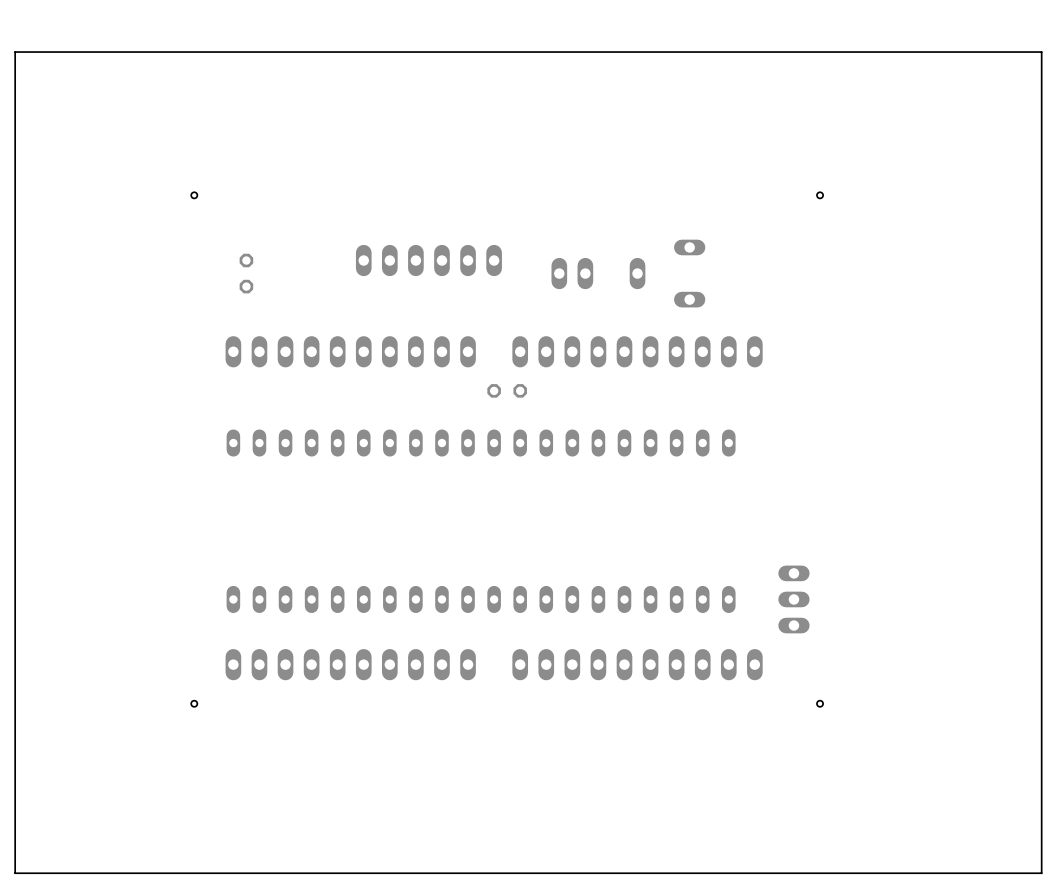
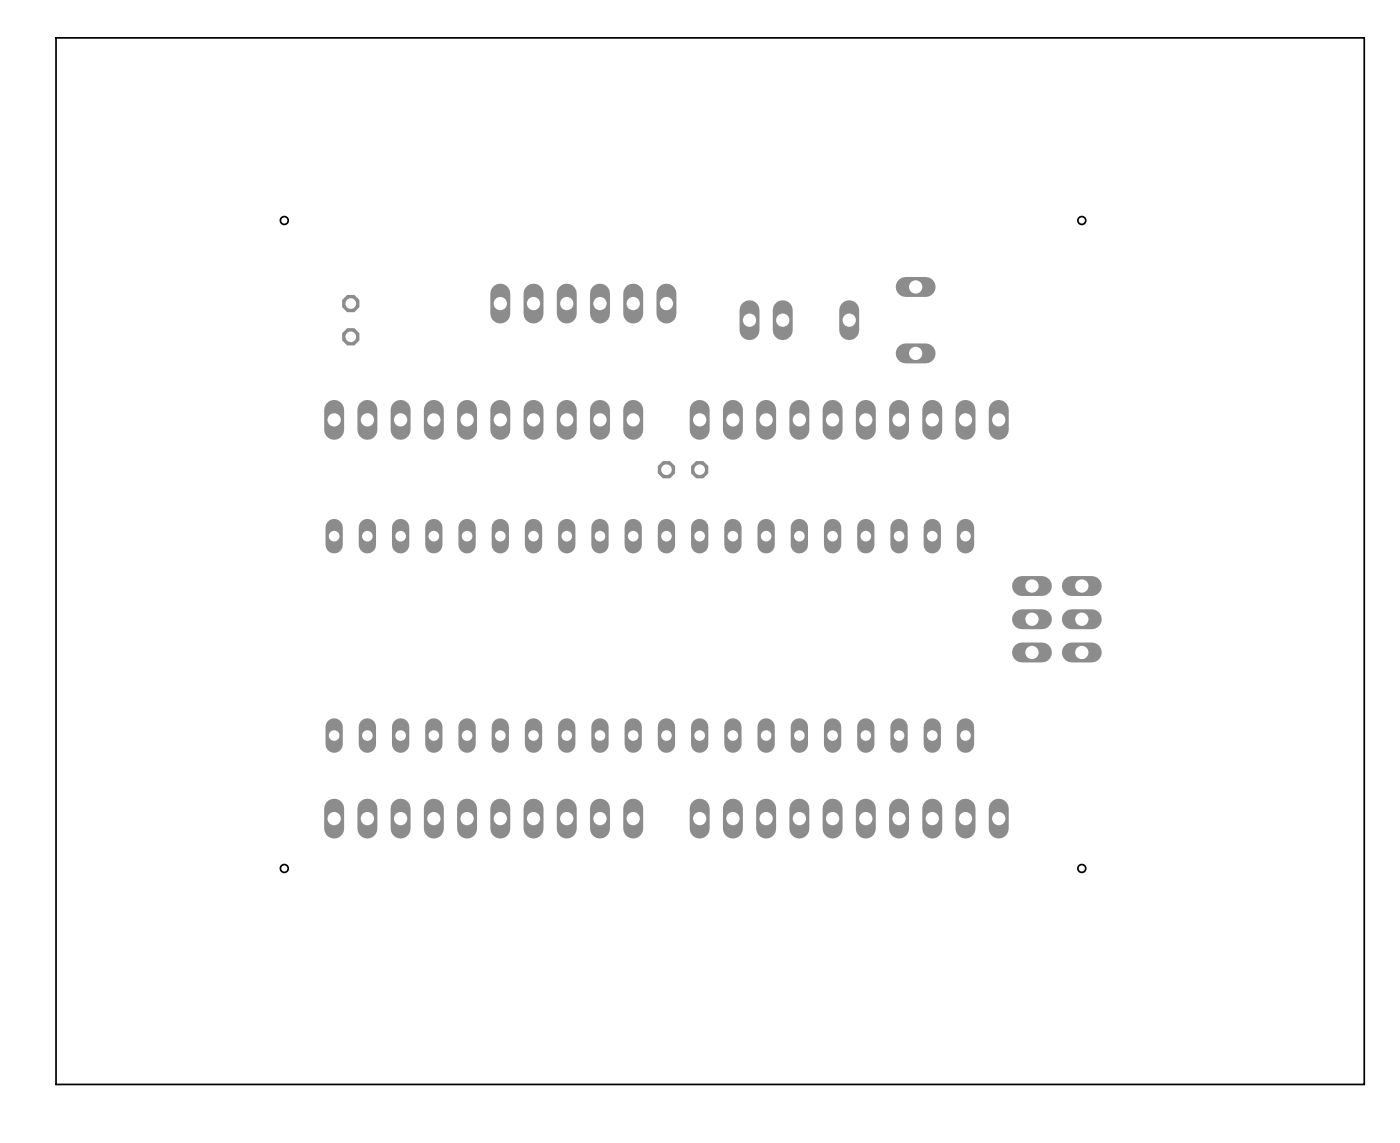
part: none -> (1031, 619)
part: none -> (1081, 619)
part: (793, 599) -> none

